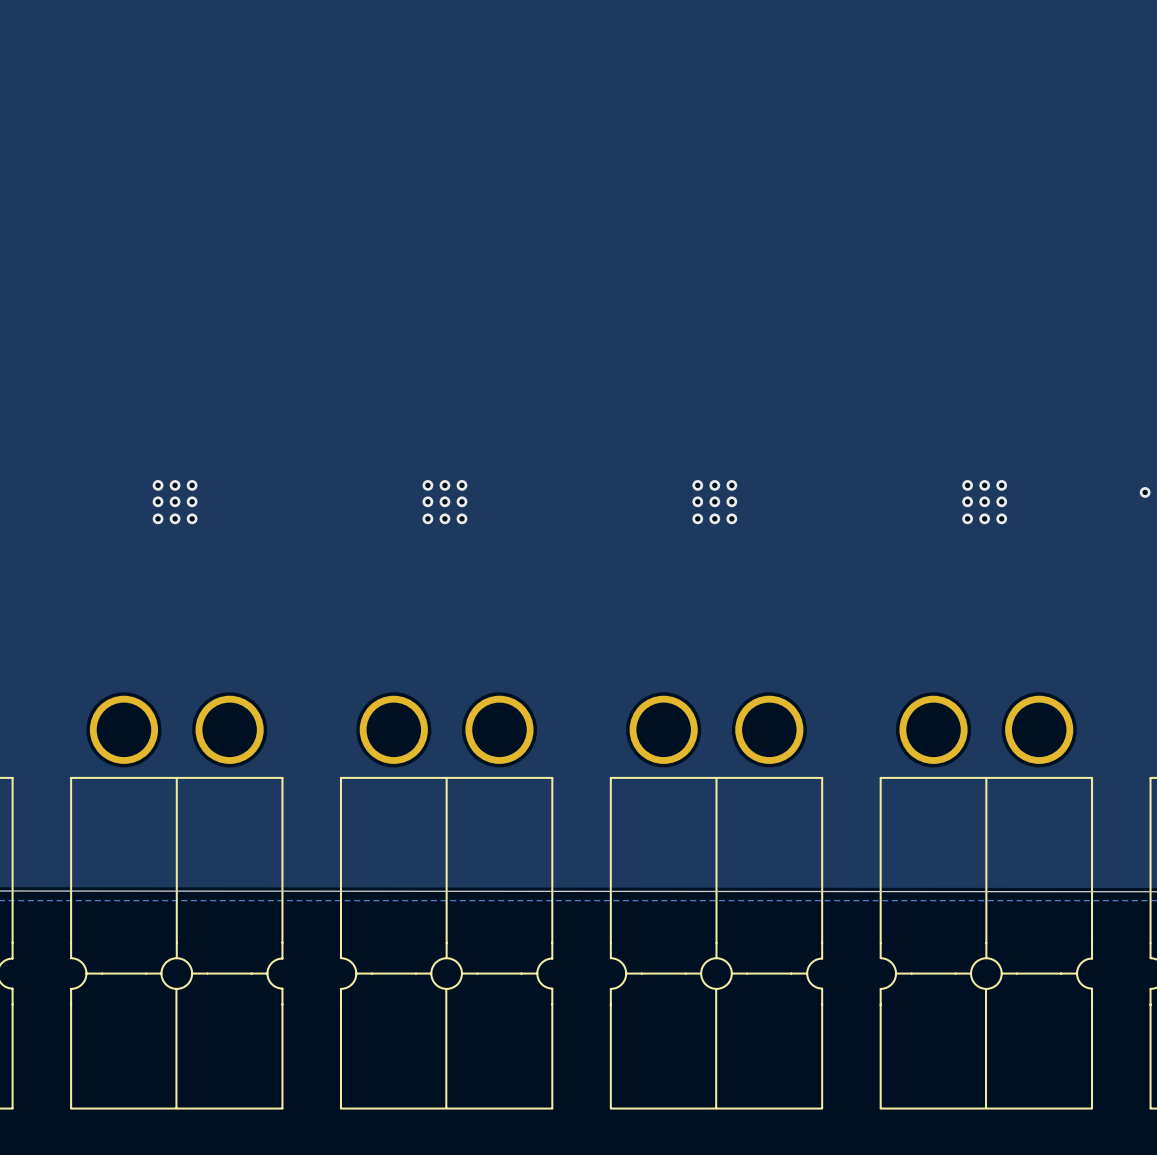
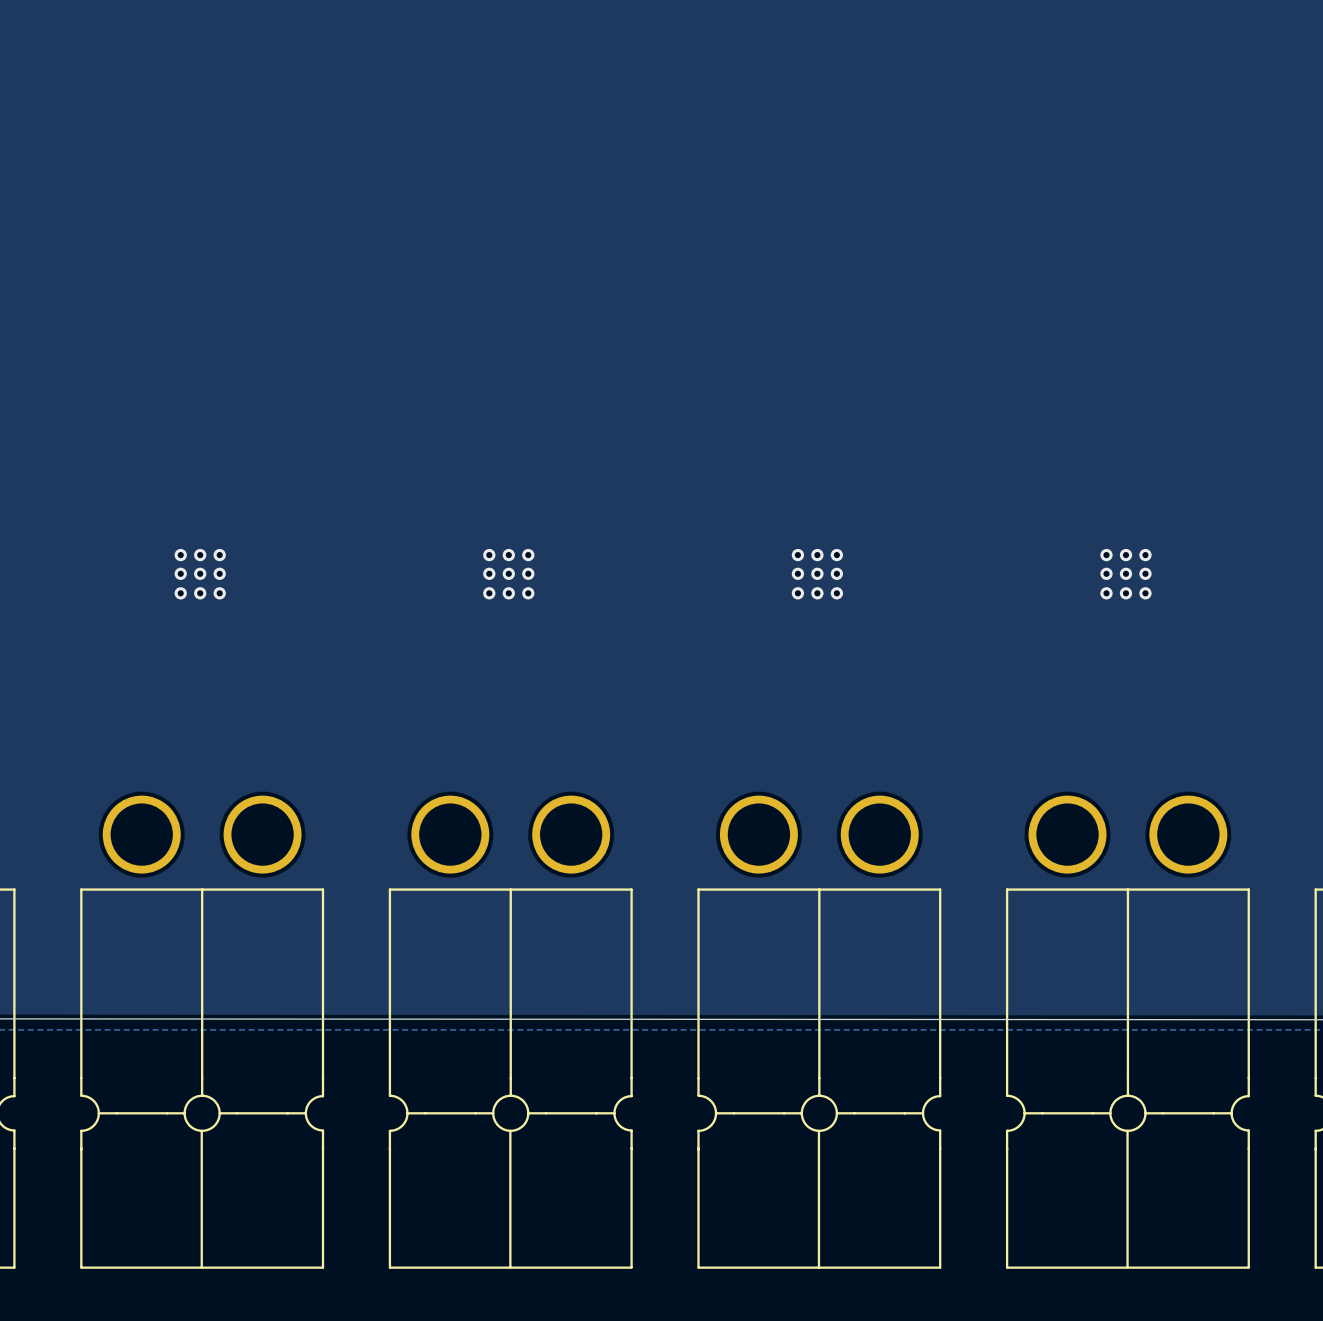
via: (1145, 492) -> none

